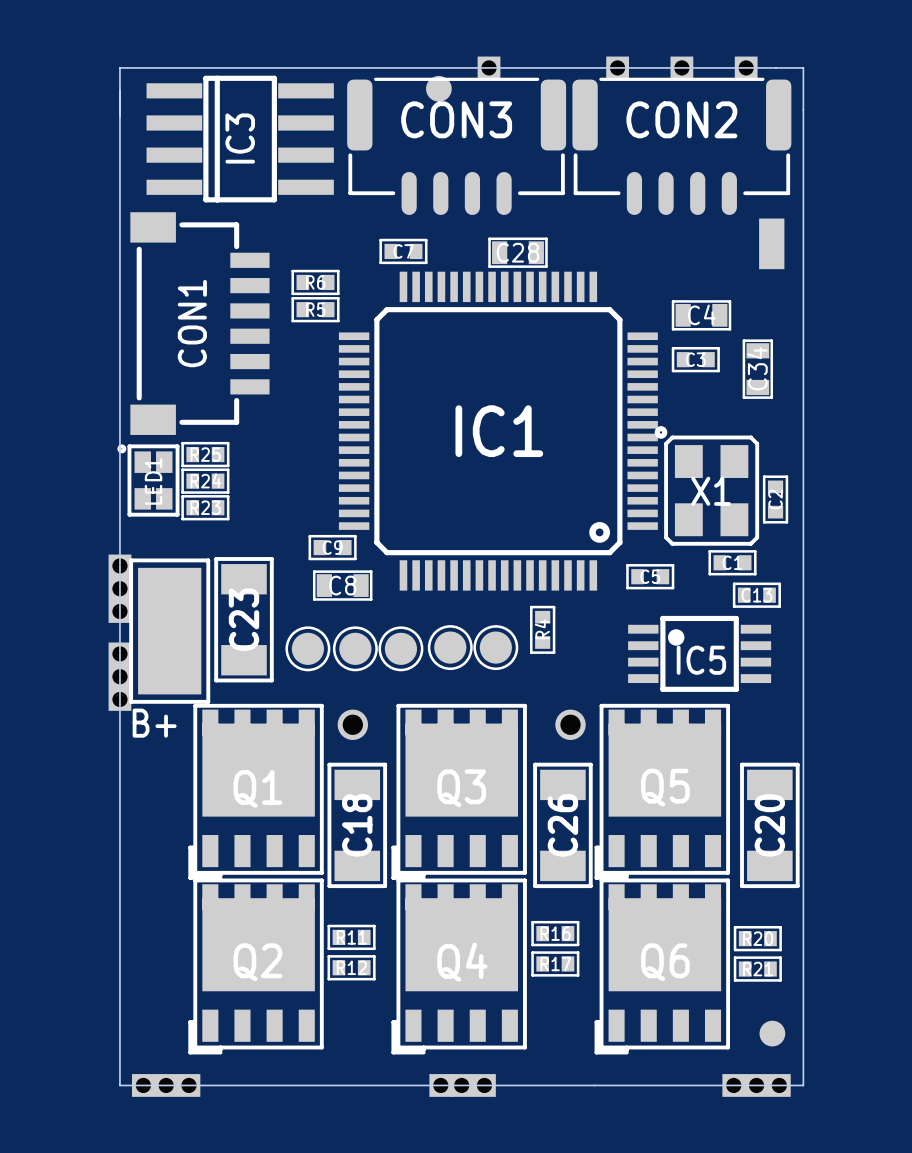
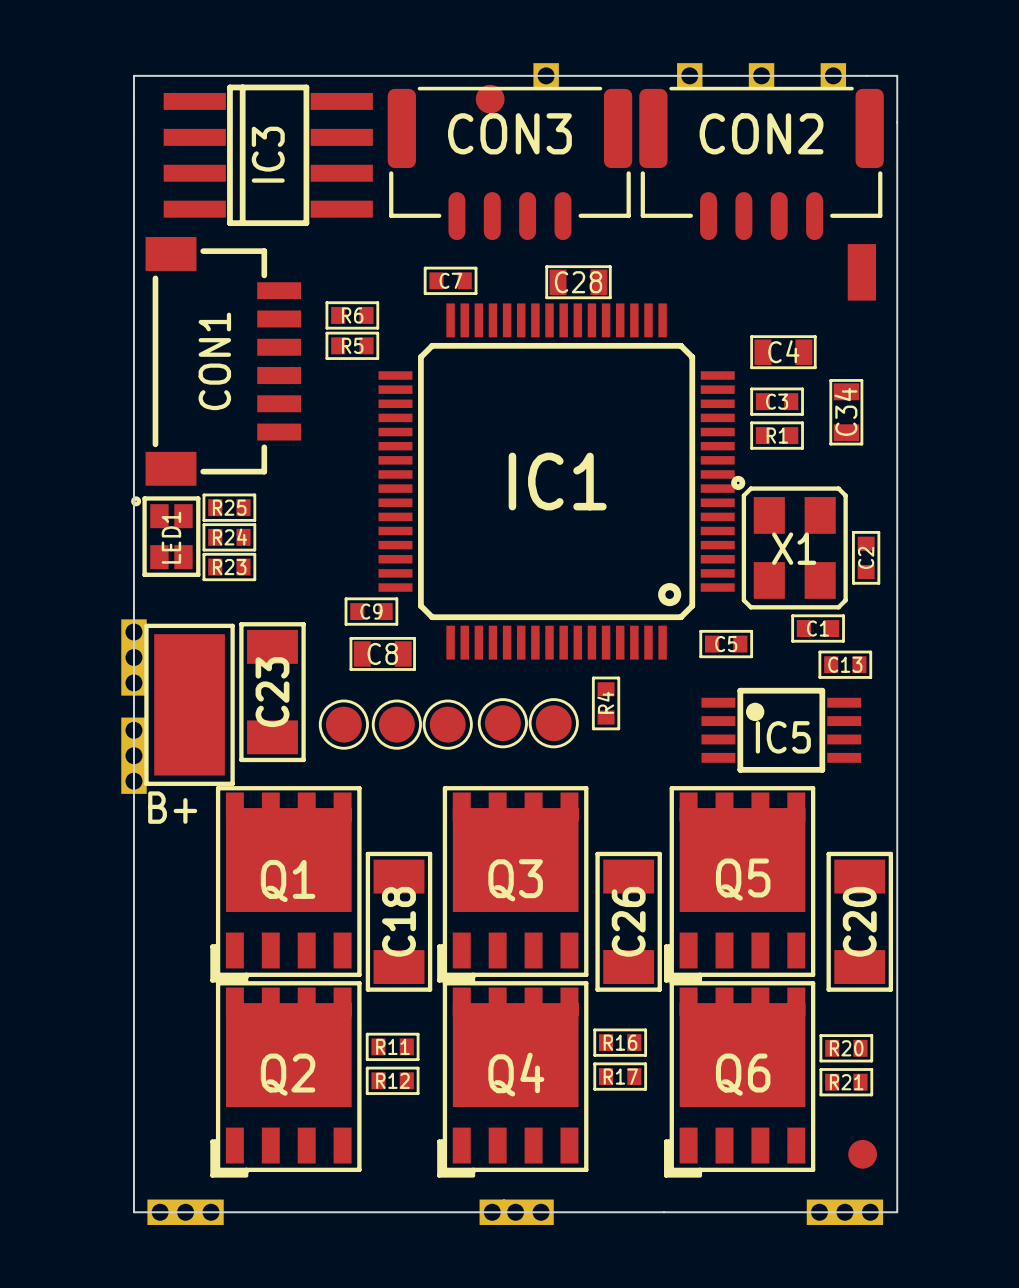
R1: none -> (777, 435)
part: (352, 724) -> none
part: (570, 724) -> none

